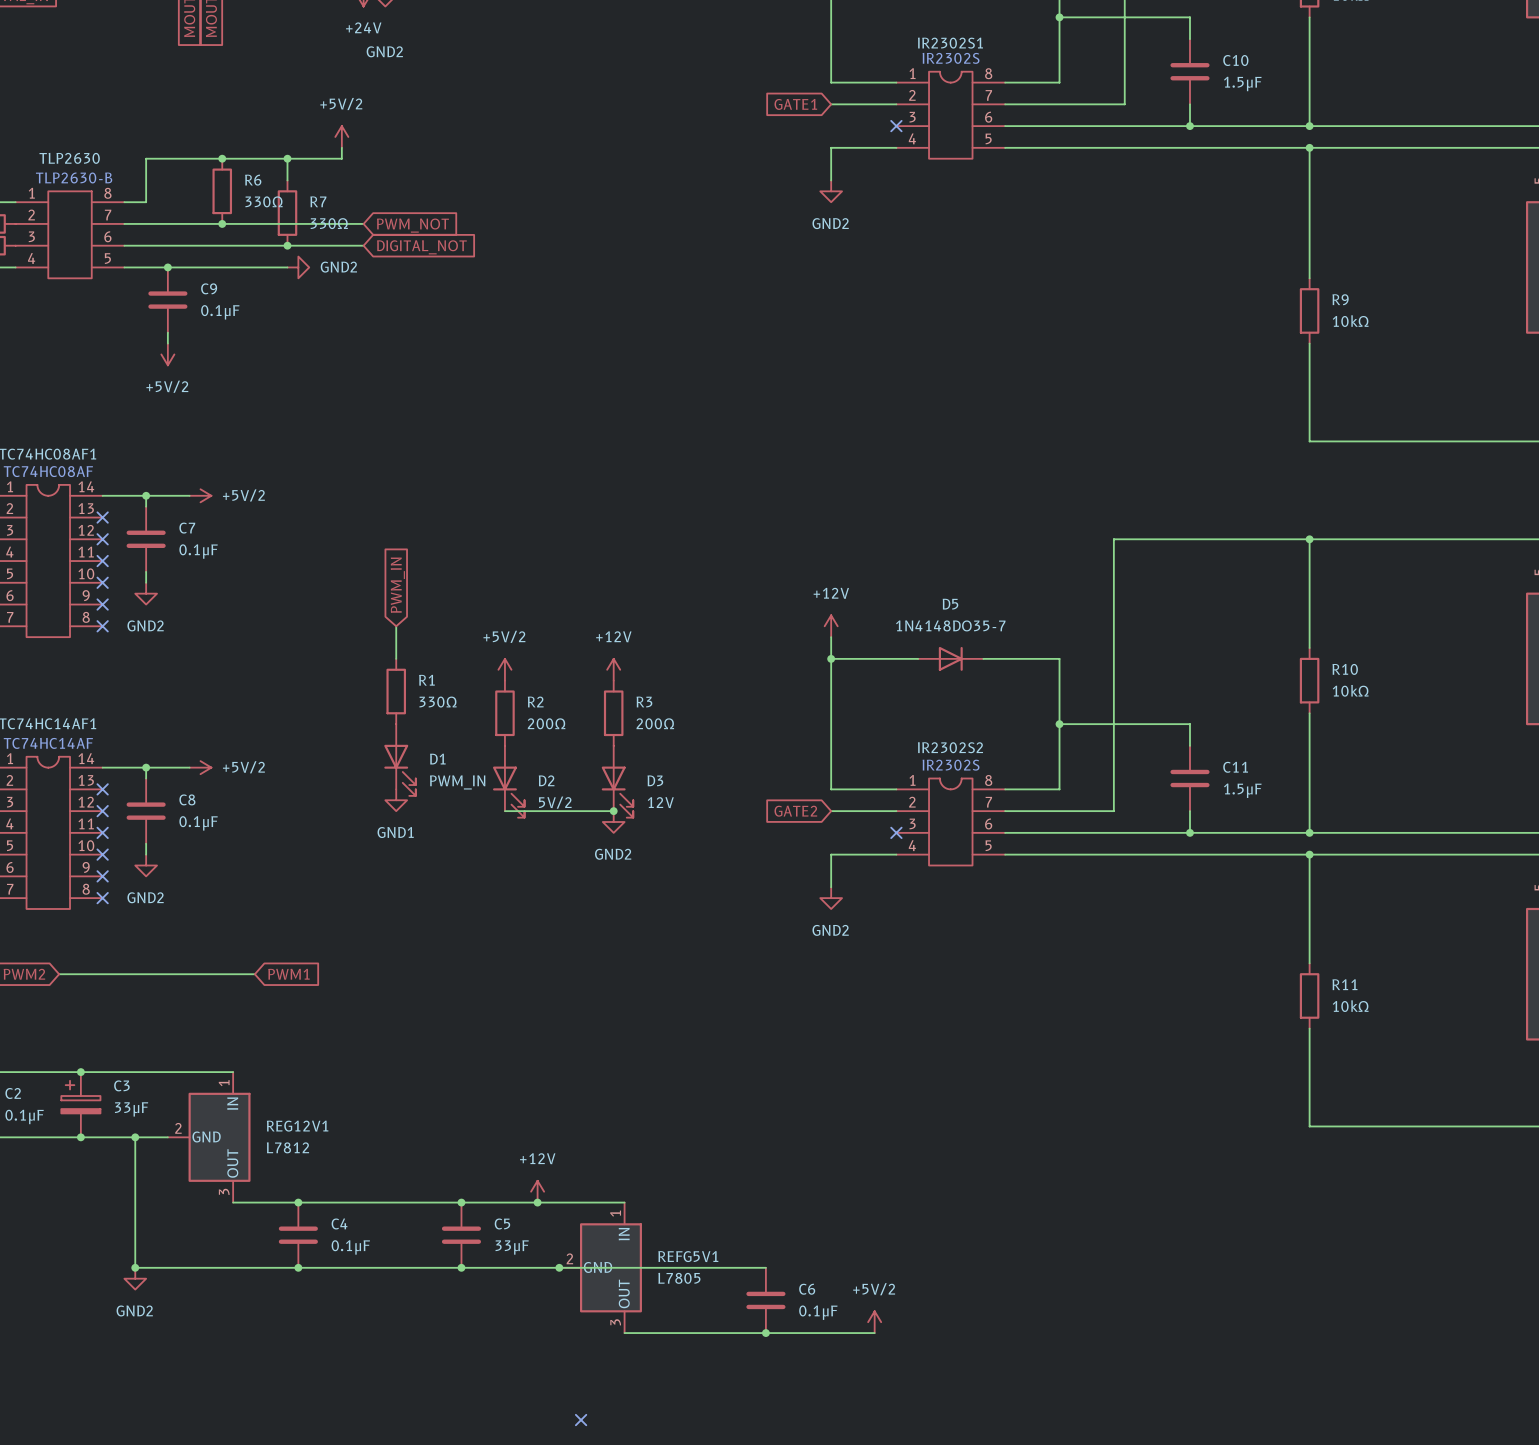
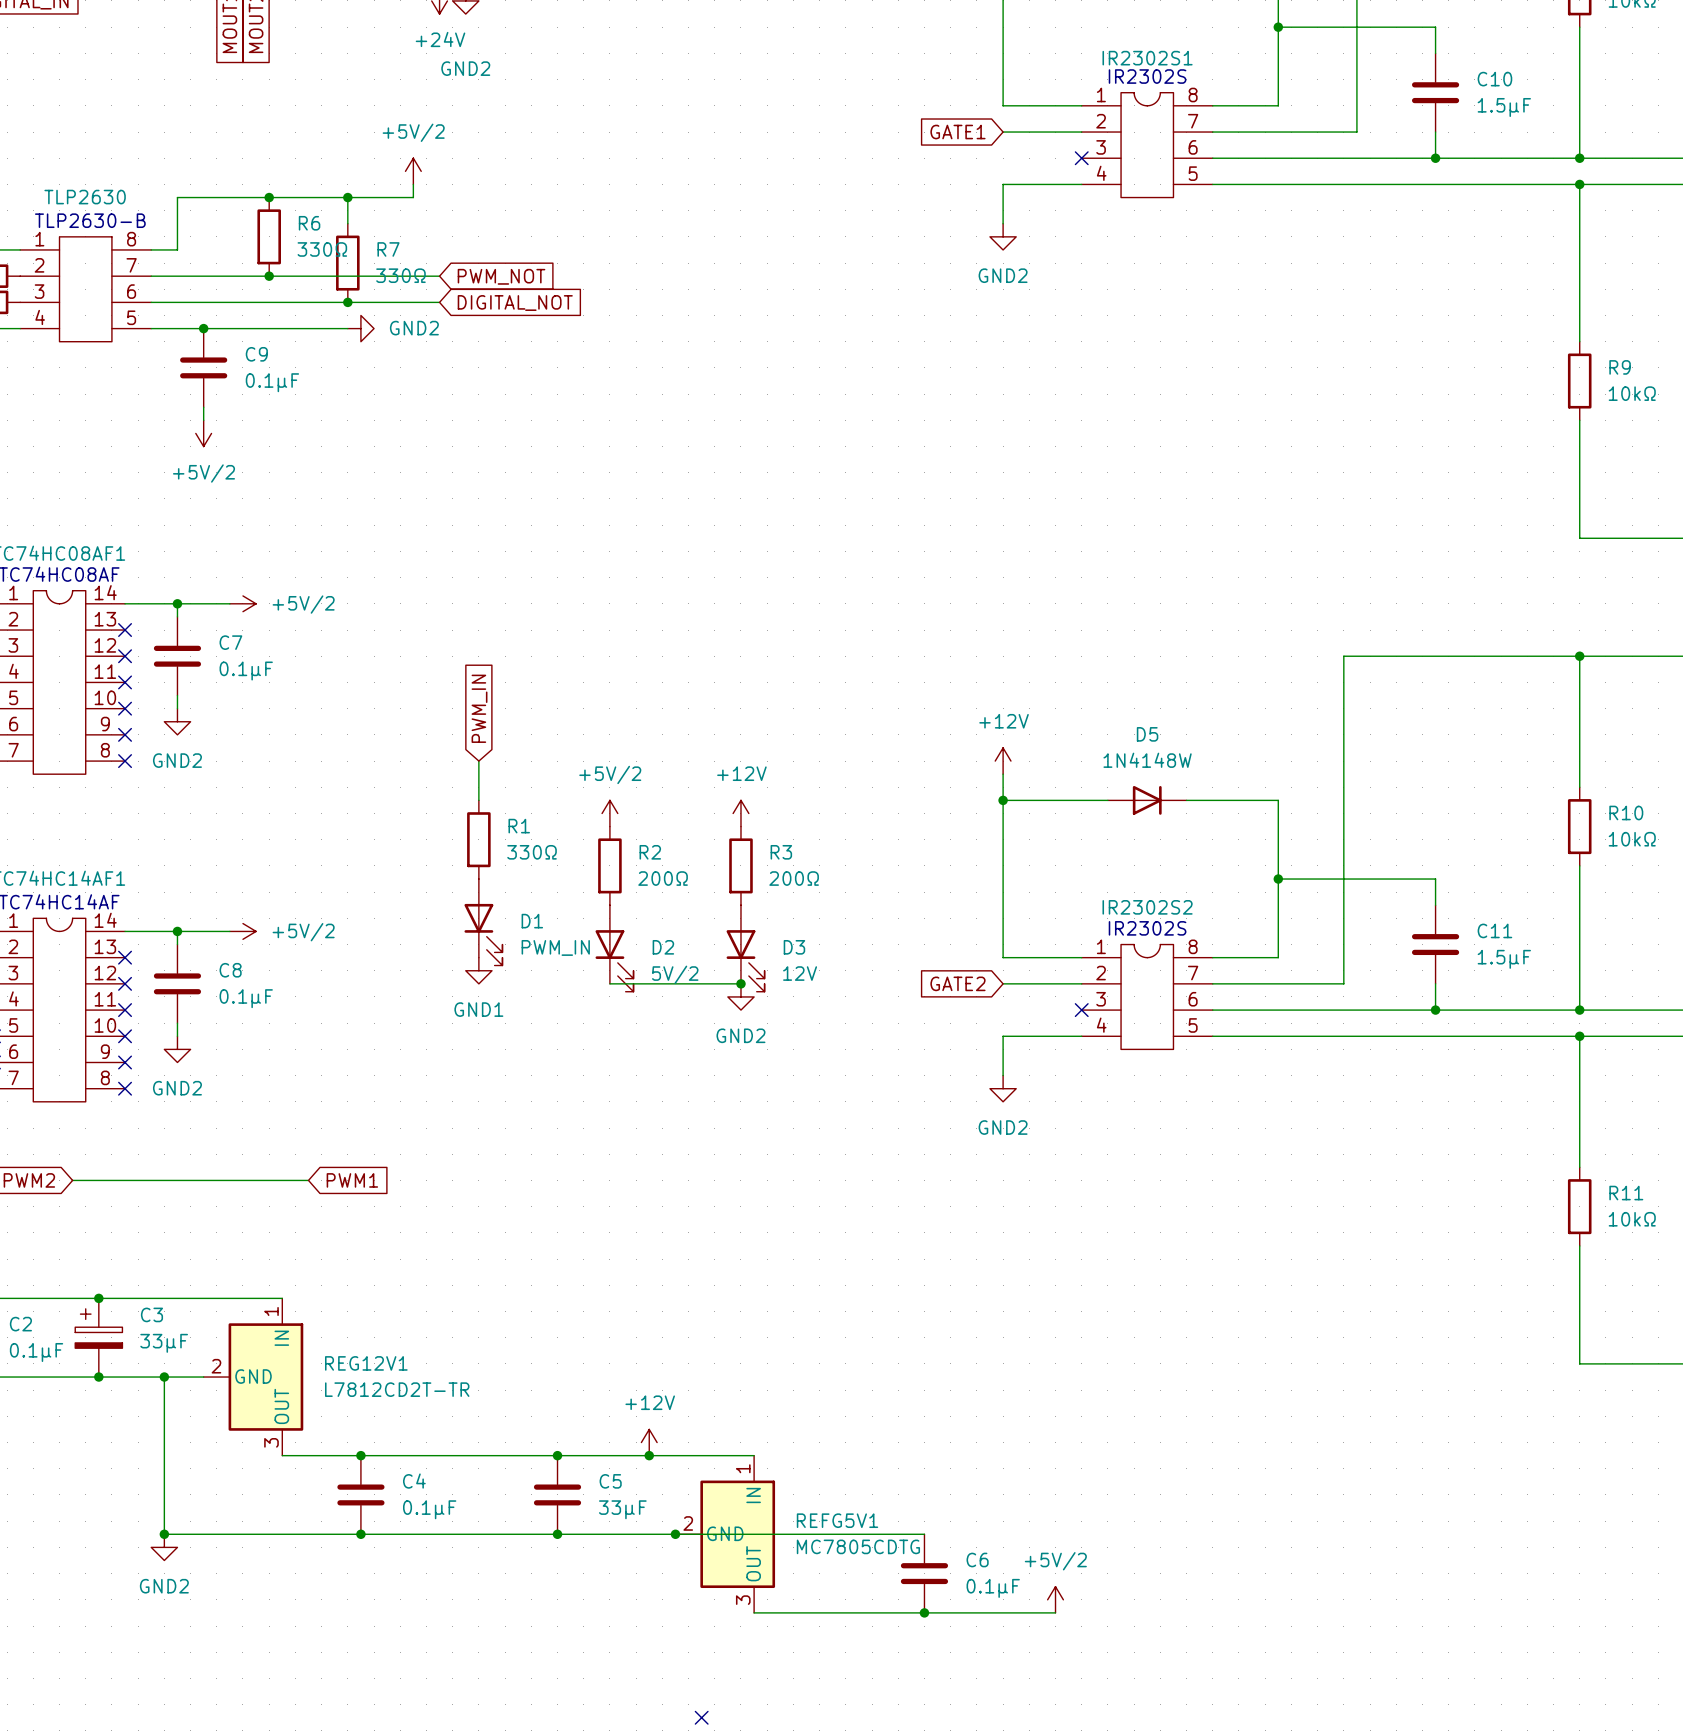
D5 value: 1N4148DO35-7 (950, 625) -> 1N4148W (1147, 760)
REG12V1 value: L7812 (287, 1147) -> L7812CD2T-TR (397, 1389)
REFG5V1 value: L7805 (679, 1278) -> MC7805CDTG (858, 1546)

